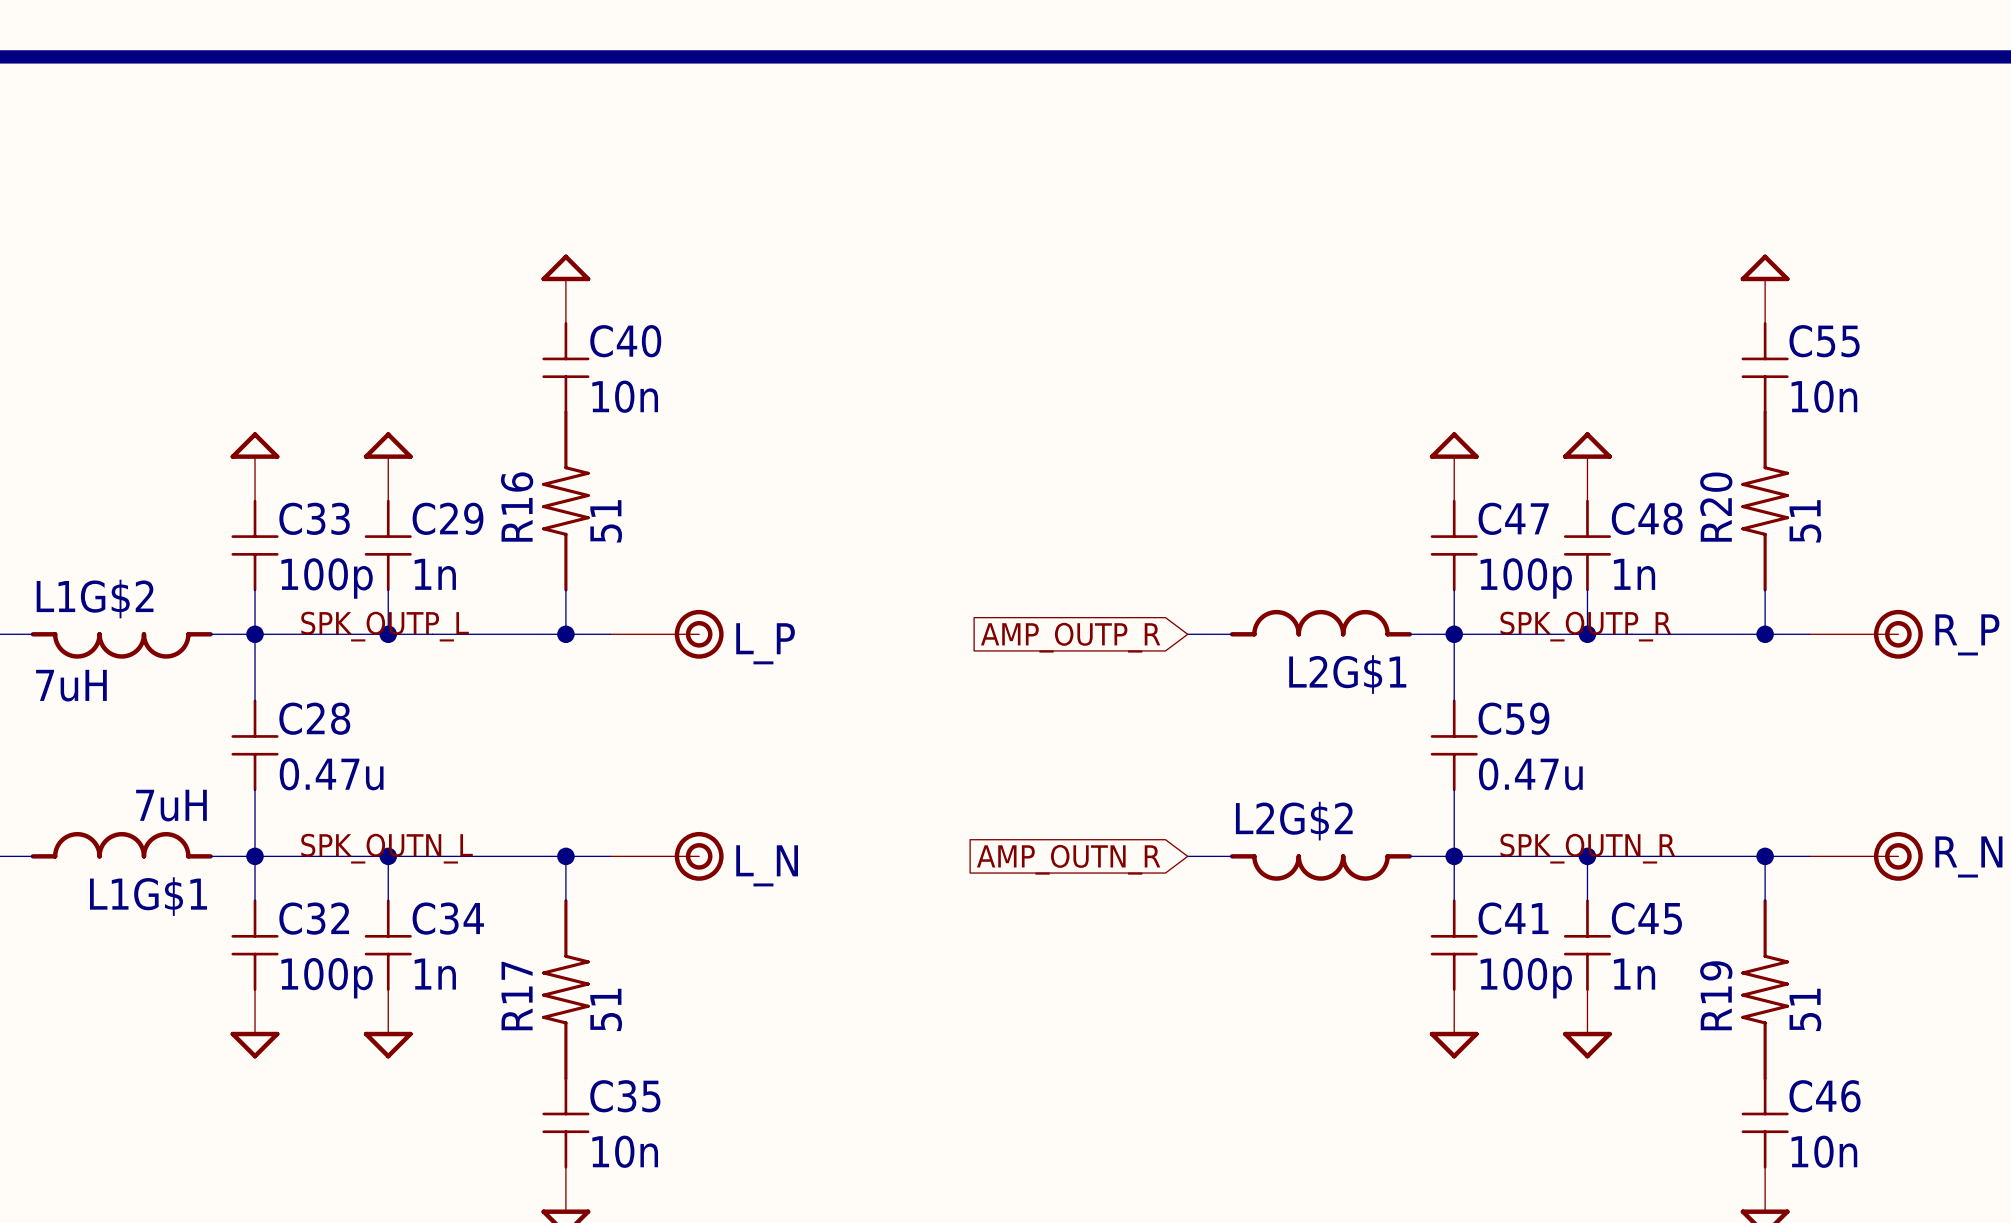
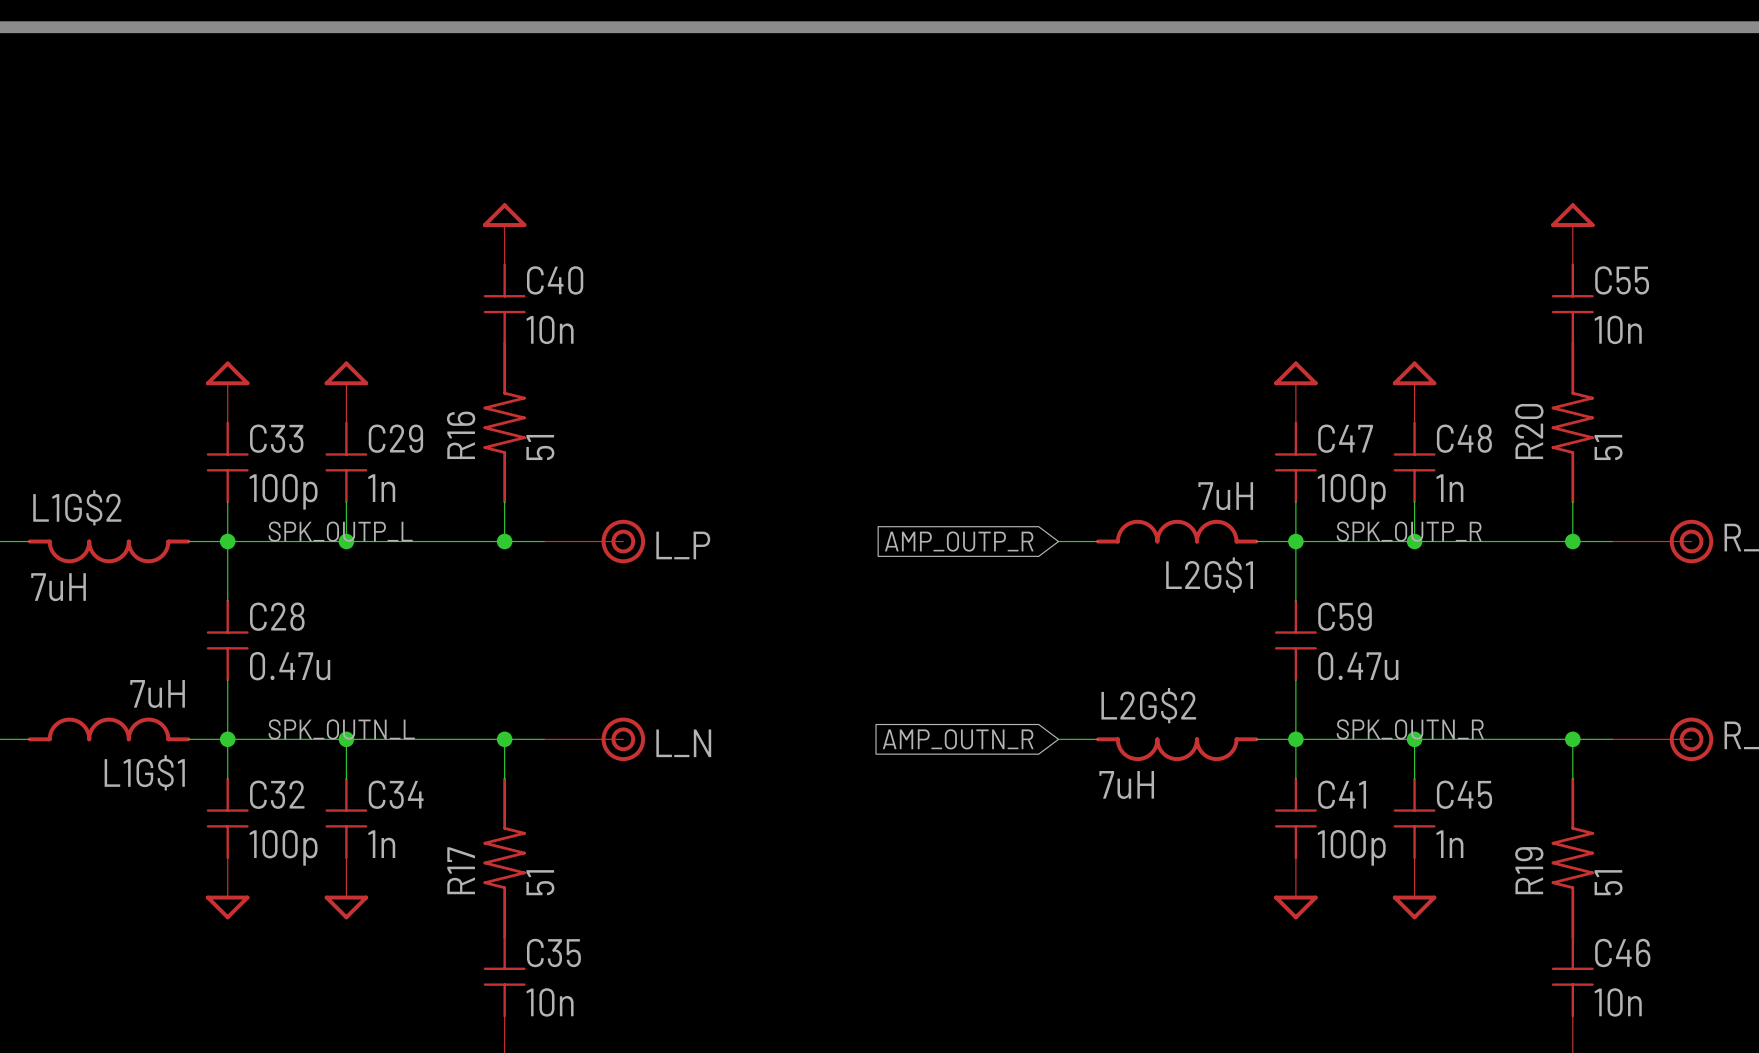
L2G$1 value: none -> 7uH (1225, 496)
L2G$2 value: none -> 7uH (1126, 784)

